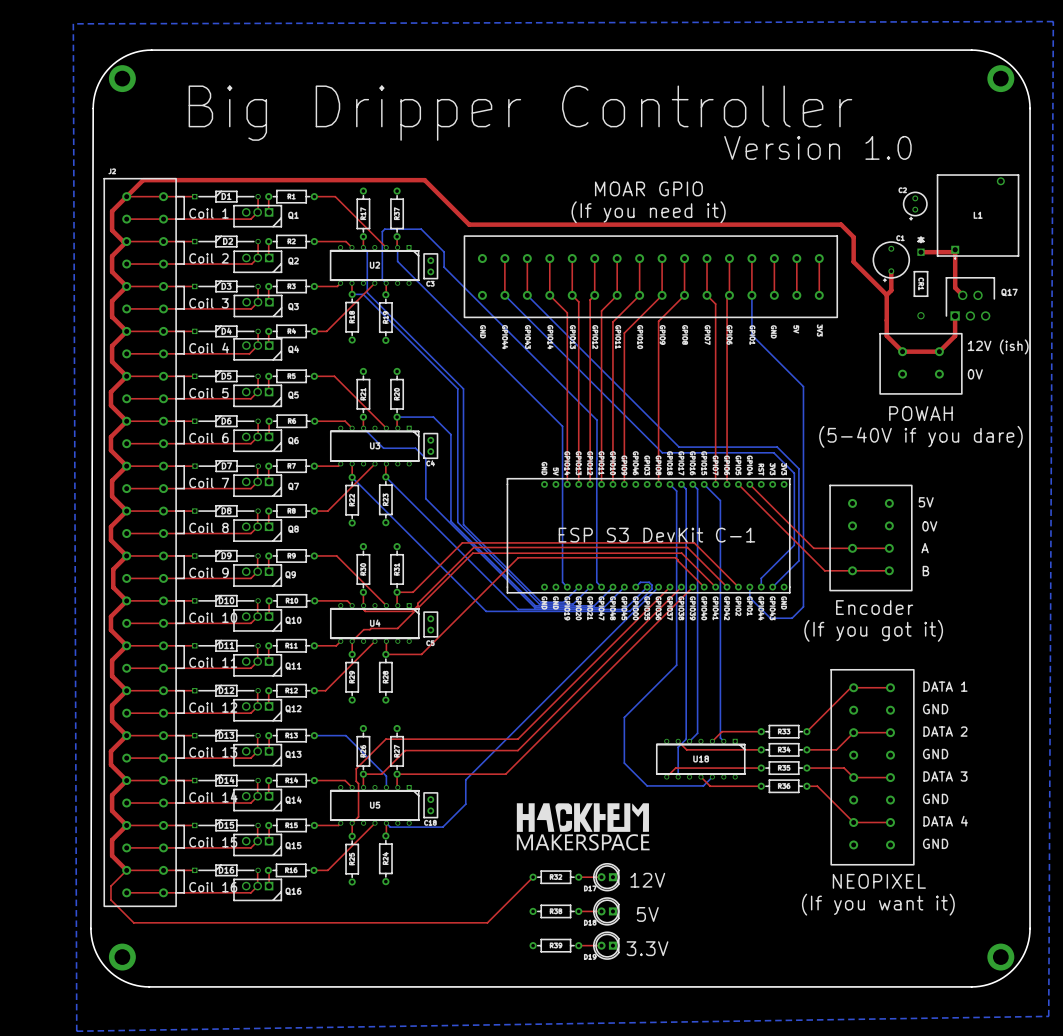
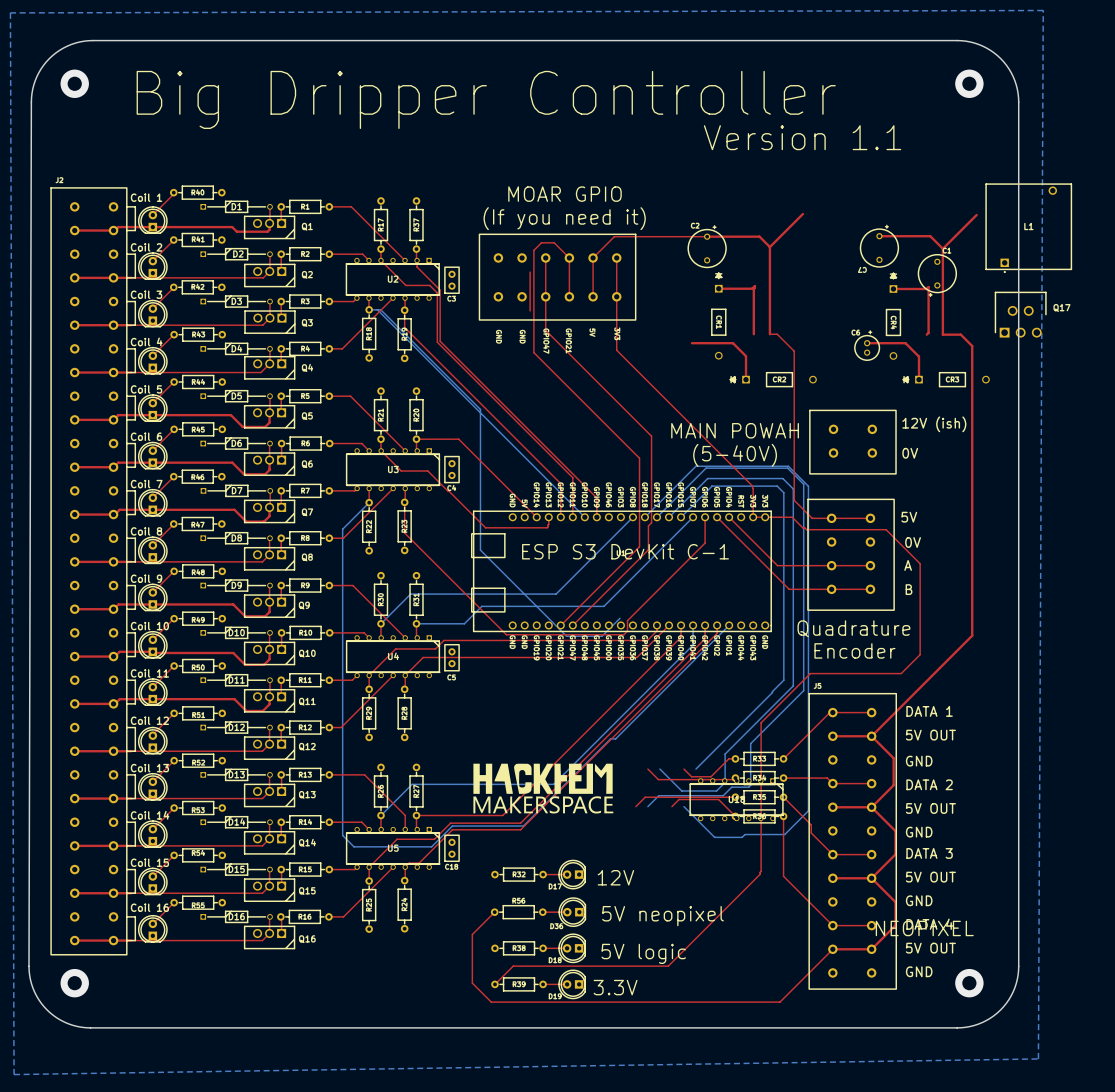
bottom zone outline: (1053, 21) (1048, 1016) (76, 1031) (73, 23) (1053, 21) -> (1043, 10) (1038, 1058) (14, 1074) (10, 12) (1043, 10)
board edge: (151, 50) (971, 50) (995, 55) (1012, 67) (1026, 88) (1030, 108) (1030, 928) (1024, 952) (1012, 969) (995, 981) (971, 986) (149, 986) (125, 981) (108, 969) (96, 952) (90, 928) (93, 104) (98, 84) (113, 64) (131, 53) (151, 50) -> (92, 40) (957, 40) (982, 46) (1000, 58) (1013, 76) (1018, 102) (1018, 966) (1013, 991) (1000, 1009) (982, 1022) (957, 1027) (90, 1027) (64, 1022) (47, 1009) (34, 991) (28, 966) (31, 97) (36, 76) (49, 58) (67, 46) (92, 40)
via: (122, 78) -> none
via: (1000, 78) -> none
via: none -> (74, 83)
via: none -> (969, 83)
text position: Big Dripper Controller (520, 113) -> Big Dripper Controller (486, 99)
text: Version 1.0 (817, 147) -> Version 1.1 (802, 137)
part footprint: [104, 178, 185, 907] -> [50, 187, 136, 956]
top track: none -> (173, 192) (152, 215)
part: none -> (197, 192)
text position: MOAR GPIO (648, 188) -> MOAR GPIO (565, 194)
top track: (126, 196) (194, 196) -> none
top track: none -> (802, 214) (769, 247)
part: (915, 204) -> none
top track: none -> (976, 214) (942, 248)
part: none -> (152, 220)
top track: (257, 212) (250, 219) (126, 219) -> (269, 223) (267, 231) (236, 231) (232, 227) (118, 227) (114, 230) (74, 230)
text position: (If you need it) (648, 212) -> (If you need it) (564, 218)
top track: none -> (879, 236) (930, 236) (942, 248)
top track: none -> (173, 239) (152, 261)
part: none -> (197, 239)
top track: none -> (769, 247) (759, 236) (614, 236) (593, 257) (593, 296)
top track: none -> (769, 247) (769, 334) (777, 334) (794, 351) (794, 500) (812, 518) (870, 518)
part: none -> (879, 248)
part: none -> (707, 248)
top track: none -> (942, 248) (942, 334) (960, 334) (972, 346) (972, 635) (871, 736)
top track: (126, 241) (194, 241) -> none
top track: (126, 241) (123, 241) (112, 230) (112, 211) (143, 180) (424, 180) (469, 224) (841, 224) (853, 237) (853, 261) (886, 295) -> none
top track: (126, 241) (112, 256) (112, 271) (126, 286) -> none
top track: none -> (545, 257) (545, 330) (651, 436) (651, 522) (648, 525) (648, 549) (572, 625)
top track: none -> (616, 257) (616, 350) (752, 486) (753, 517) (792, 517) (806, 529) (886, 529) (920, 563) (920, 654) (901, 673) (810, 673) (761, 722) (760, 874) (668, 966) (513, 966) (494, 984)
bottom track: (363, 247) (367, 251) (367, 292) (463, 388) (463, 524) (541, 602) (563, 602) (578, 587) -> none
top track: none -> (381, 260) (405, 285) (429, 285) (437, 293) (437, 342) (572, 477) (572, 517)
bottom track: (397, 247) (397, 261) (562, 426) (562, 582) (567, 587) -> none
top track: none -> (417, 260) (417, 267) (440, 290) (440, 341) (596, 498) (596, 517)
part: none -> (152, 266)
top track: (920, 252) (952, 252) (955, 249) (955, 287) (962, 295) -> none
top track: (527, 258) (527, 295) -> none
top track: (549, 258) (549, 295) (567, 312) (567, 484) -> none
top track: (572, 258) (572, 295) (578, 301) (578, 484) -> none
top track: (594, 258) (594, 295) (590, 299) (590, 484) -> none
top track: (617, 258) (617, 295) (601, 310) (601, 484) -> none
top track: (639, 258) (639, 295) (612, 322) (612, 484) -> none
top track: (662, 258) (662, 295) (624, 333) (624, 484) -> none
top track: (684, 258) (684, 295) (658, 321) (658, 484) -> none
top track: (707, 258) (707, 295) (715, 304) (715, 484) -> none
top track: (729, 258) (729, 295) (727, 297) (727, 484) -> none
top track: (751, 258) (751, 295) -> none
top track: (774, 258) (774, 295) -> none
top track: (796, 258) (796, 295) -> none
top track: (819, 258) (819, 295) -> none
part: none -> (557, 277)
top track: none -> (74, 277) (131, 277)
top track: (891, 271) (891, 290) (886, 295) -> none
top track: none -> (173, 287) (152, 308)
part: none -> (197, 287)
top track: none -> (718, 288) (752, 288) (754, 286) (753, 334)
top track: none -> (893, 289) (926, 289) (928, 287) (928, 332) (926, 334)
part: (650, 276) -> none
part position: (920, 277) -> (718, 315)
top track: none -> (569, 296) (569, 257) (554, 242) (541, 242) (533, 250) (533, 352) (639, 458) (639, 546) (560, 625)
bottom track: (386, 283) (382, 279) (382, 231) (384, 229) (421, 229) (444, 252) (444, 267) (596, 420) (596, 582) (601, 587) -> none
top track: (126, 286) (194, 286) -> none
top track: (126, 286) (112, 301) (112, 317) (126, 331) -> none
bottom track: none -> (377, 309) (584, 517)
top track: none -> (404, 310) (404, 327) (560, 483) (560, 517)
bottom track: (504, 295) (662, 452) (773, 452) (794, 473) (794, 545) (761, 578) (761, 587) -> none
bottom track: (527, 295) (679, 447) (777, 447) (798, 468) (798, 560) (772, 587) -> none
bottom track: (751, 295) (751, 335) (803, 386) (803, 606) (792, 618) (770, 618) (749, 597) (749, 587) -> none
top track: (886, 295) (886, 335) (902, 351) (939, 351) (955, 335) (955, 315) -> none
part: none -> (152, 313)
part: none -> (893, 316)
top track: none -> (74, 325) (131, 325)
top track: none -> (174, 334) (152, 355)
part: none -> (198, 334)
top track: none -> (691, 343) (732, 343) (746, 356) (746, 379)
top track: none -> (867, 343) (905, 343) (918, 356) (918, 379)
part: none -> (867, 347)
top track: (126, 331) (194, 331) -> none
top track: (126, 331) (112, 345) (112, 361) (126, 376) -> none
part: none -> (152, 360)
top track: none -> (74, 372) (131, 372)
part: none -> (773, 379)
part: none -> (946, 379)
top track: none -> (174, 382) (152, 403)
part: none -> (198, 382)
part: (920, 363) -> none
top track: (126, 376) (194, 376) -> none
top track: (126, 376) (110, 392) (110, 405) (126, 421) -> none
part: none -> (152, 408)
top track: (257, 392) (250, 398) (126, 398) -> (269, 412) (269, 422) (265, 426) (242, 426) (230, 415) (118, 415) (113, 419) (74, 419)
top track: none -> (174, 429) (152, 450)
part: none -> (198, 429)
text: none -> MAIN POWAH (735, 430)
text: POWAH (920, 413) -> none
bottom track: (397, 417) (433, 417) (450, 434) (450, 521) (535, 605) (594, 605) (612, 587) -> none
top track: none -> (416, 439) (458, 439) (536, 517)
part: none -> (852, 442)
top track: (126, 421) (194, 421) -> none
top track: (126, 421) (110, 436) (110, 450) (126, 466) -> none
top track: (258, 422) (258, 436) (250, 443) (126, 443) -> (269, 444) (269, 469) (265, 474) (243, 474) (232, 462) (118, 462) (113, 467) (74, 467)
bottom track: (363, 428) (383, 448) (415, 448) (425, 458) (425, 498) (534, 607) (603, 607) (624, 587) -> none
top track: none -> (381, 450) (401, 470) (427, 470) (485, 527) (547, 527) (548, 517)
part: none -> (152, 455)
text: none -> (5-40V) (735, 455)
text: (5-40V if you dare) (920, 436) -> none
top track: none -> (173, 476) (152, 497)
part: none -> (197, 476)
top track: (386, 463) (385, 477) -> (405, 488) (404, 533) (506, 634) (623, 634) (627, 631) (627, 620) (705, 543) (705, 517)
top track: (126, 466) (194, 466) -> none
top track: (126, 466) (112, 480) (112, 496) (126, 511) -> none
top track: (258, 466) (257, 481) (250, 488) (126, 488) -> (270, 490) (269, 516) (264, 521) (246, 521) (234, 509) (119, 509) (114, 514) (74, 514)
part: none -> (152, 502)
bottom track: (352, 477) (486, 611) (629, 611) (651, 589) (651, 585) (649, 582) (640, 582) (635, 587) -> (369, 502) (342, 529) (342, 835) (354, 846) (431, 846) (452, 826) (523, 826) (610, 738) (615, 738) (729, 625)
bottom track: (385, 477) (518, 609) (624, 609) (647, 587) -> none
bottom track: (670, 484) (676, 491) (676, 665) (624, 717) (624, 763) (647, 785) (703, 785) (712, 776) -> none
bottom track: (681, 484) (686, 489) (686, 739) (678, 747) (678, 776) -> none
bottom track: (692, 484) (697, 489) (697, 733) (689, 741) -> none
bottom track: (704, 484) (720, 500) (720, 737) (723, 741) -> none
top track: (738, 484) (824, 570) (889, 570) -> none
top track: (749, 484) (813, 548) (889, 548) -> none
bottom track: none -> (632, 517) (556, 594) (410, 594) (381, 623)
bottom track: none -> (644, 517) (695, 466) (788, 466) (808, 486) (808, 810) (784, 834) (745, 834) (742, 837) (714, 837) (683, 806)
bottom track: none -> (656, 517) (706, 468) (787, 468) (803, 484) (803, 690) (750, 743) (750, 785) (748, 787) (731, 787) (723, 795) (658, 795) (647, 806)
bottom track: none -> (669, 517) (707, 478) (782, 478) (793, 488) (793, 685) (725, 754) (725, 782) (716, 790) (681, 790) (659, 769)
bottom track: none -> (681, 517) (711, 486) (777, 486) (783, 492) (783, 680) (695, 769)
bottom track: none -> (693, 517) (603, 606) (481, 606) (464, 623) (416, 623)
top track: none -> (717, 517) (789, 589) (870, 589)
top track: none -> (729, 517) (777, 565) (870, 565)
top track: none -> (173, 524) (152, 545)
part: none -> (197, 524)
top track: (126, 511) (194, 511) -> none
top track: (126, 511) (110, 526) (110, 540) (126, 555) -> none
part: none -> (152, 550)
top track: none -> (74, 561) (131, 561)
part: (648, 535) -> none
text position: ESP S3 DevKit C-1 (656, 535) -> ESP S3 DevKit C-1 (625, 551)
part position: (870, 538) -> (851, 554)
top track: none -> (174, 571) (152, 592)
part: none -> (198, 571)
part: none -> (621, 571)
top track: (126, 555) (194, 555) -> none
top track: (126, 555) (113, 569) (113, 587) (126, 600) -> none
part: none -> (152, 597)
top track: (257, 571) (250, 578) (126, 578) -> (269, 602) (269, 612) (265, 616) (245, 616) (233, 604) (118, 604) (113, 609) (74, 609)
top track: none -> (174, 618) (152, 639)
part: none -> (198, 618)
bottom track: (658, 587) (465, 779) (465, 804) (442, 827) (390, 827) (386, 823) -> none
top track: (670, 587) (517, 739) (385, 739) (356, 768) (356, 781) (358, 783) (358, 816) -> (705, 625) (705, 638) (520, 823) (450, 823) (434, 839) (397, 839) (375, 860)
top track: (681, 587) (517, 750) (405, 750) (381, 774) (363, 774) -> none
top track: (692, 587) (505, 774) (478, 774) -> (681, 625) (681, 637) (502, 815)
top track: (704, 587) (675, 557) (518, 557) (421, 654) (385, 654) -> none
top track: (715, 587) (681, 553) (472, 553) (397, 628) (363, 629) -> (656, 625) (656, 630) (647, 640) (443, 640) (435, 648) (395, 648) (381, 663)
top track: (727, 587) (687, 547) (473, 547) (412, 611) (365, 611) (363, 605) -> none
top track: (738, 587) (694, 542) (462, 542) (413, 592) (397, 592) -> none
top track: none -> (669, 625) (636, 657) (423, 657) (405, 675)
bottom track: none -> (693, 625) (693, 645) (553, 784) (412, 784) (381, 815)
top track: none -> (717, 625) (717, 633) (520, 829) (452, 829) (419, 863) (409, 863) (405, 867)
text: none -> Quadrature (853, 628)
top track: (126, 600) (194, 600) -> none
top track: (126, 600) (110, 616) (110, 630) (126, 645) -> none
text position: Encoder (874, 607) -> Encoder (854, 650)
part: none -> (152, 644)
top track: (257, 616) (250, 623) (126, 623) -> (269, 649) (269, 659) (264, 664) (245, 664) (233, 653) (119, 651) (114, 656) (74, 656)
text: (If you got it) (873, 630) -> none
top track: none -> (174, 666) (152, 687)
part: none -> (198, 666)
top track: (126, 645) (194, 645) -> none
top track: (126, 645) (112, 660) (112, 676) (126, 690) -> none
top track: (258, 645) (257, 661) (250, 668) (126, 668) -> (269, 680) (269, 704) (262, 710) (246, 710) (234, 699) (119, 699) (114, 703) (74, 703)
part: none -> (152, 692)
top track: none -> (174, 713) (152, 735)
part: none -> (198, 713)
top track: (890, 687) (850, 687) (806, 731) -> (871, 712) (829, 712) (783, 758)
top track: (126, 690) (194, 690) -> none
top track: (126, 690) (112, 705) (112, 721) (126, 735) -> none
top track: none -> (832, 736) (871, 736)
top track: none -> (871, 736) (893, 758) (893, 785) (871, 807)
part: none -> (152, 740)
top track: none -> (74, 751) (131, 751)
top track: none -> (735, 758) (728, 758) (710, 776) (691, 776) (683, 769)
top track: none -> (174, 760) (152, 781)
part: none -> (198, 760)
top track: none -> (647, 769) (658, 779) (733, 779) (735, 778)
top track: (761, 731) (722, 731) (712, 741) -> none
part position: (784, 731) -> (759, 758)
top track: (890, 732) (853, 732) (836, 749) (806, 749) -> none
top track: (126, 735) (194, 735) -> none
top track: (126, 735) (110, 751) (110, 764) (126, 780) -> none
bottom track: (314, 735) (345, 735) (386, 776) (386, 787) -> none
top track: none -> (329, 774) (364, 774) (405, 815) (405, 829)
top track: none -> (783, 778) (827, 778) (832, 783) (871, 783)
top track: (678, 741) (686, 749) (761, 749) -> none
part: none -> (152, 786)
part position: (784, 749) -> (759, 778)
top track: none -> (783, 797) (811, 824) (811, 833) (832, 854) (871, 854)
top track: none -> (74, 798) (131, 798)
top track: none -> (671, 806) (679, 799) (718, 799) (735, 816)
top track: none -> (832, 807) (871, 807)
top track: none -> (871, 807) (895, 831) (895, 854) (871, 878)
top track: none -> (174, 808) (152, 829)
part: none -> (198, 808)
part: (872, 767) -> none
top track: (761, 768) (675, 768) (666, 776) -> (735, 797) (645, 797) (635, 806)
part position: (784, 768) -> (759, 797)
top track: (806, 768) (844, 768) (853, 777) (890, 777) -> none
top track: none -> (783, 816) (783, 876) (832, 925) (871, 925)
top track: (700, 776) (710, 786) (761, 786) -> none
top track: (126, 780) (194, 780) -> none
top track: (126, 780) (112, 795) (112, 810) (126, 825) -> none
part position: (784, 786) -> (759, 816)
top track: (806, 786) (817, 786) (853, 822) (890, 822) -> none
part: none -> (152, 834)
part: none -> (852, 841)
top track: none -> (74, 845) (131, 845)
top track: none -> (174, 855) (152, 876)
part: none -> (198, 855)
top track: (126, 825) (194, 825) -> none
top track: (126, 825) (112, 840) (112, 855) (126, 870) -> none
drawing position: (583, 826) -> (543, 788)
top track: none -> (832, 878) (871, 878)
top track: none -> (871, 878) (895, 902) (895, 925) (871, 949) (832, 949) (780, 1002) (491, 1002) (472, 983) (472, 934) (494, 912)
part: none -> (152, 881)
top track: none -> (74, 893) (131, 893)
top track: none -> (174, 902) (152, 923)
part: none -> (198, 902)
part: none -> (518, 912)
top track: none -> (542, 912) (567, 912)
part: none -> (572, 912)
text: none -> 5V neopixel (662, 916)
top track: (126, 870) (194, 870) -> none
top track: (126, 870) (110, 886) (110, 900) (133, 922) (487, 922) (533, 877) -> none
part position: (555, 877) -> (519, 874)
top track: (578, 877) (601, 877) -> (543, 874) (567, 874)
part position: (606, 877) -> (572, 874)
text position: 12V (647, 880) -> 12V (615, 877)
part: none -> (152, 928)
top track: none -> (74, 940) (131, 940)
text: (If you want it) (878, 904) -> none
text: none -> 5V logic (643, 953)
part position: (555, 911) -> (519, 948)
top track: (578, 911) (601, 911) -> (543, 948) (567, 948)
part position: (606, 911) -> (572, 948)
text: 5V (647, 914) -> none
via: none -> (74, 983)
via: none -> (969, 983)
part position: (555, 945) -> (519, 984)
top track: (578, 945) (601, 945) -> (543, 984) (567, 984)
part position: (606, 945) -> (572, 984)
text position: 3.3V (647, 948) -> 3.3V (615, 987)
via: (122, 957) -> none
via: (1000, 957) -> none

